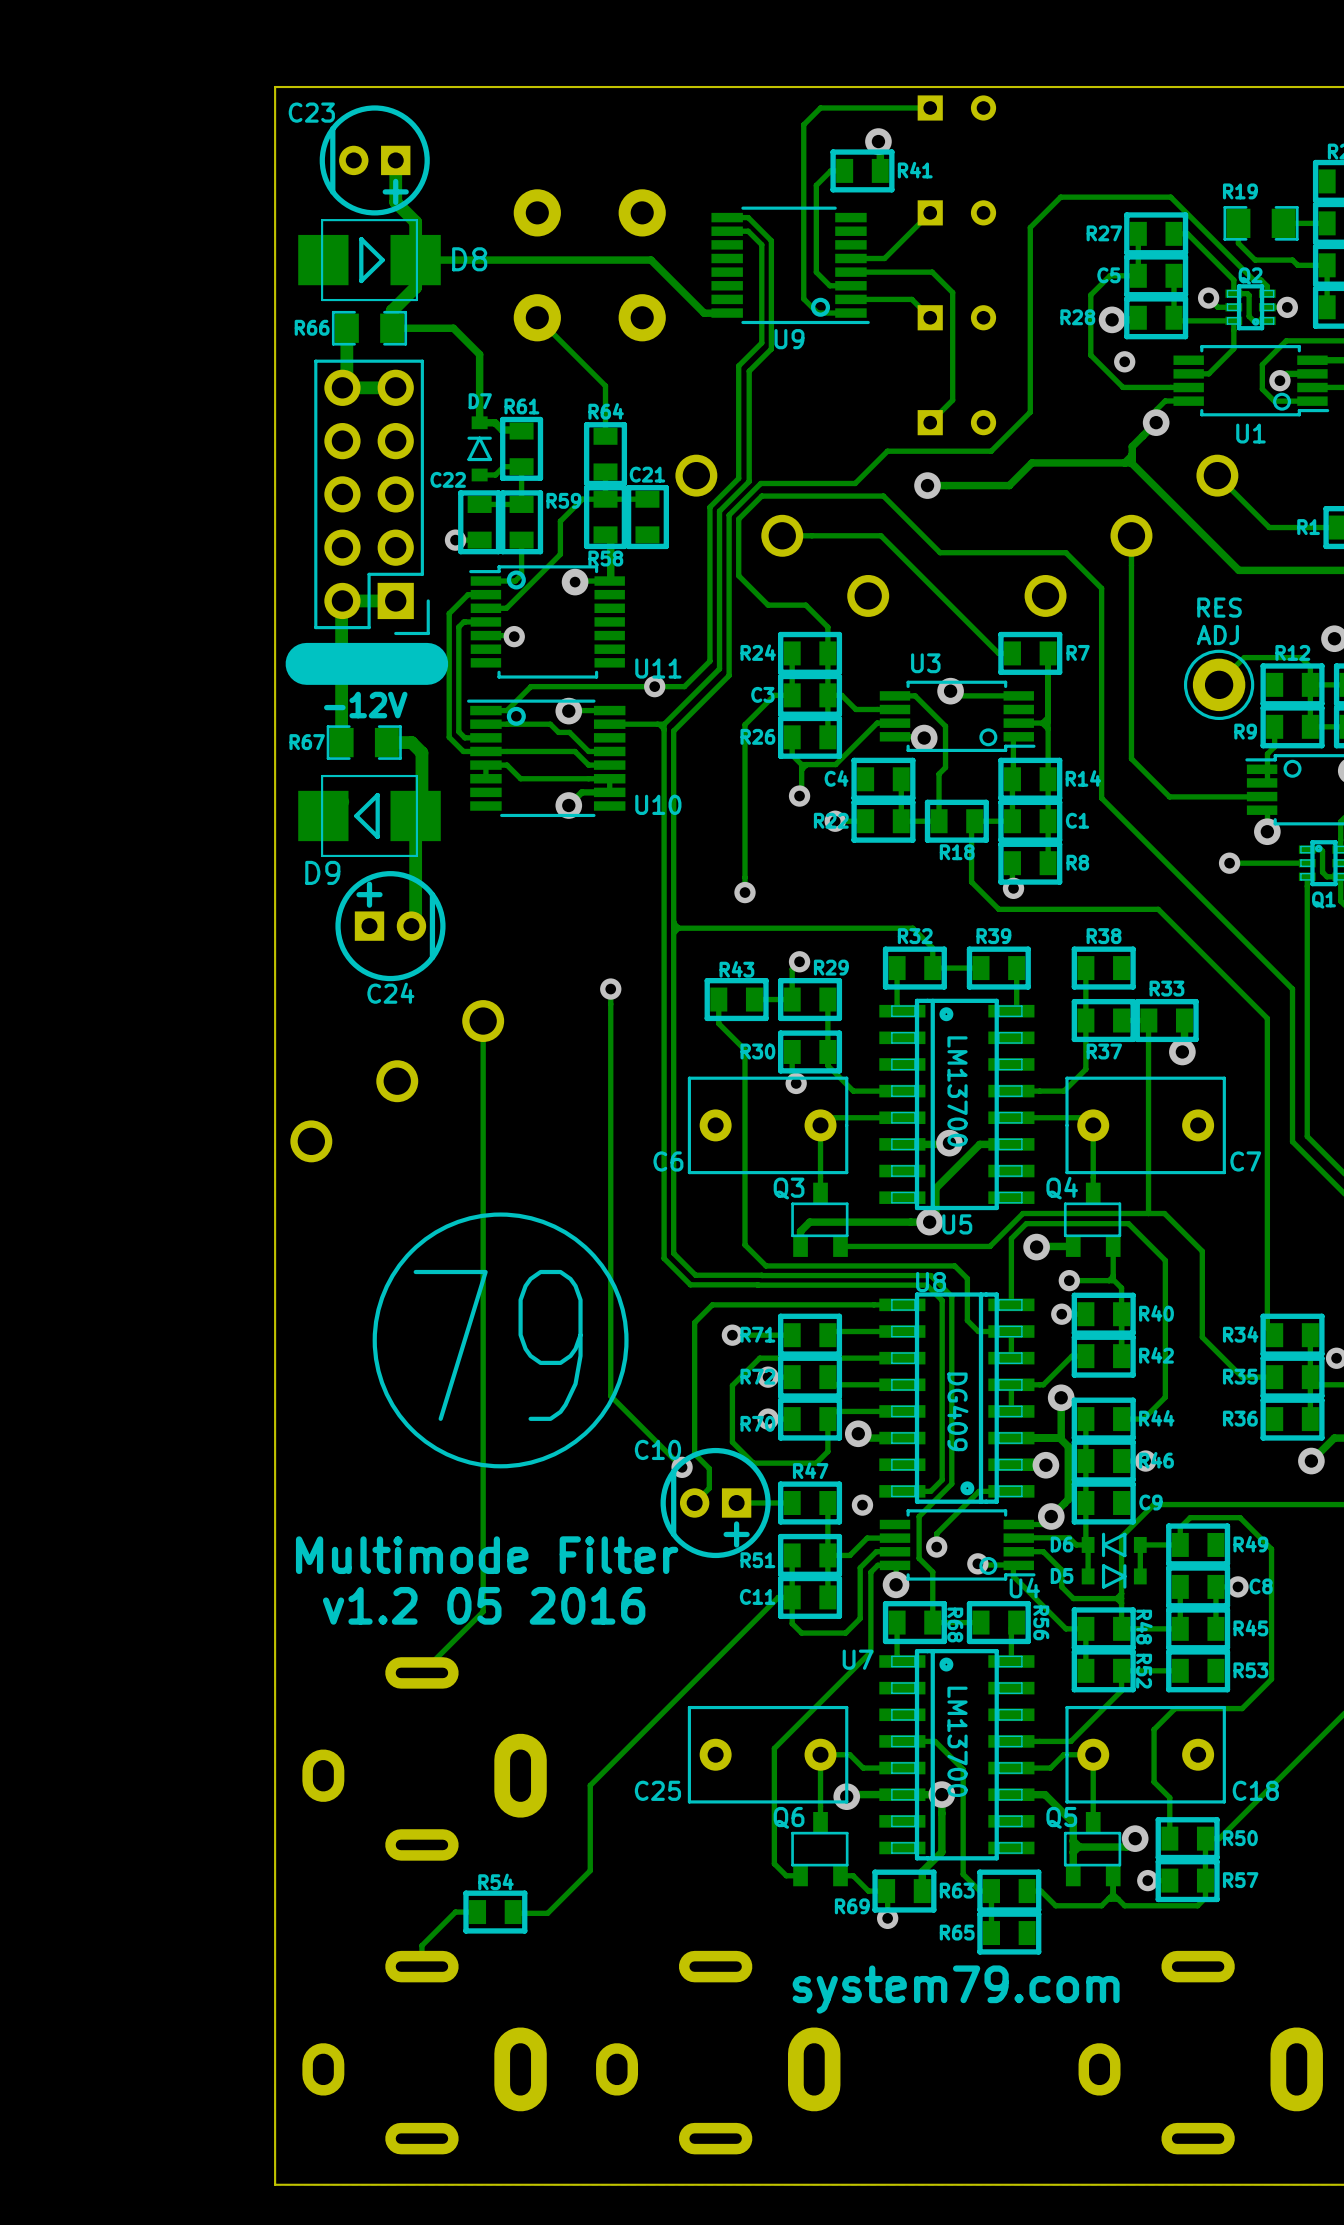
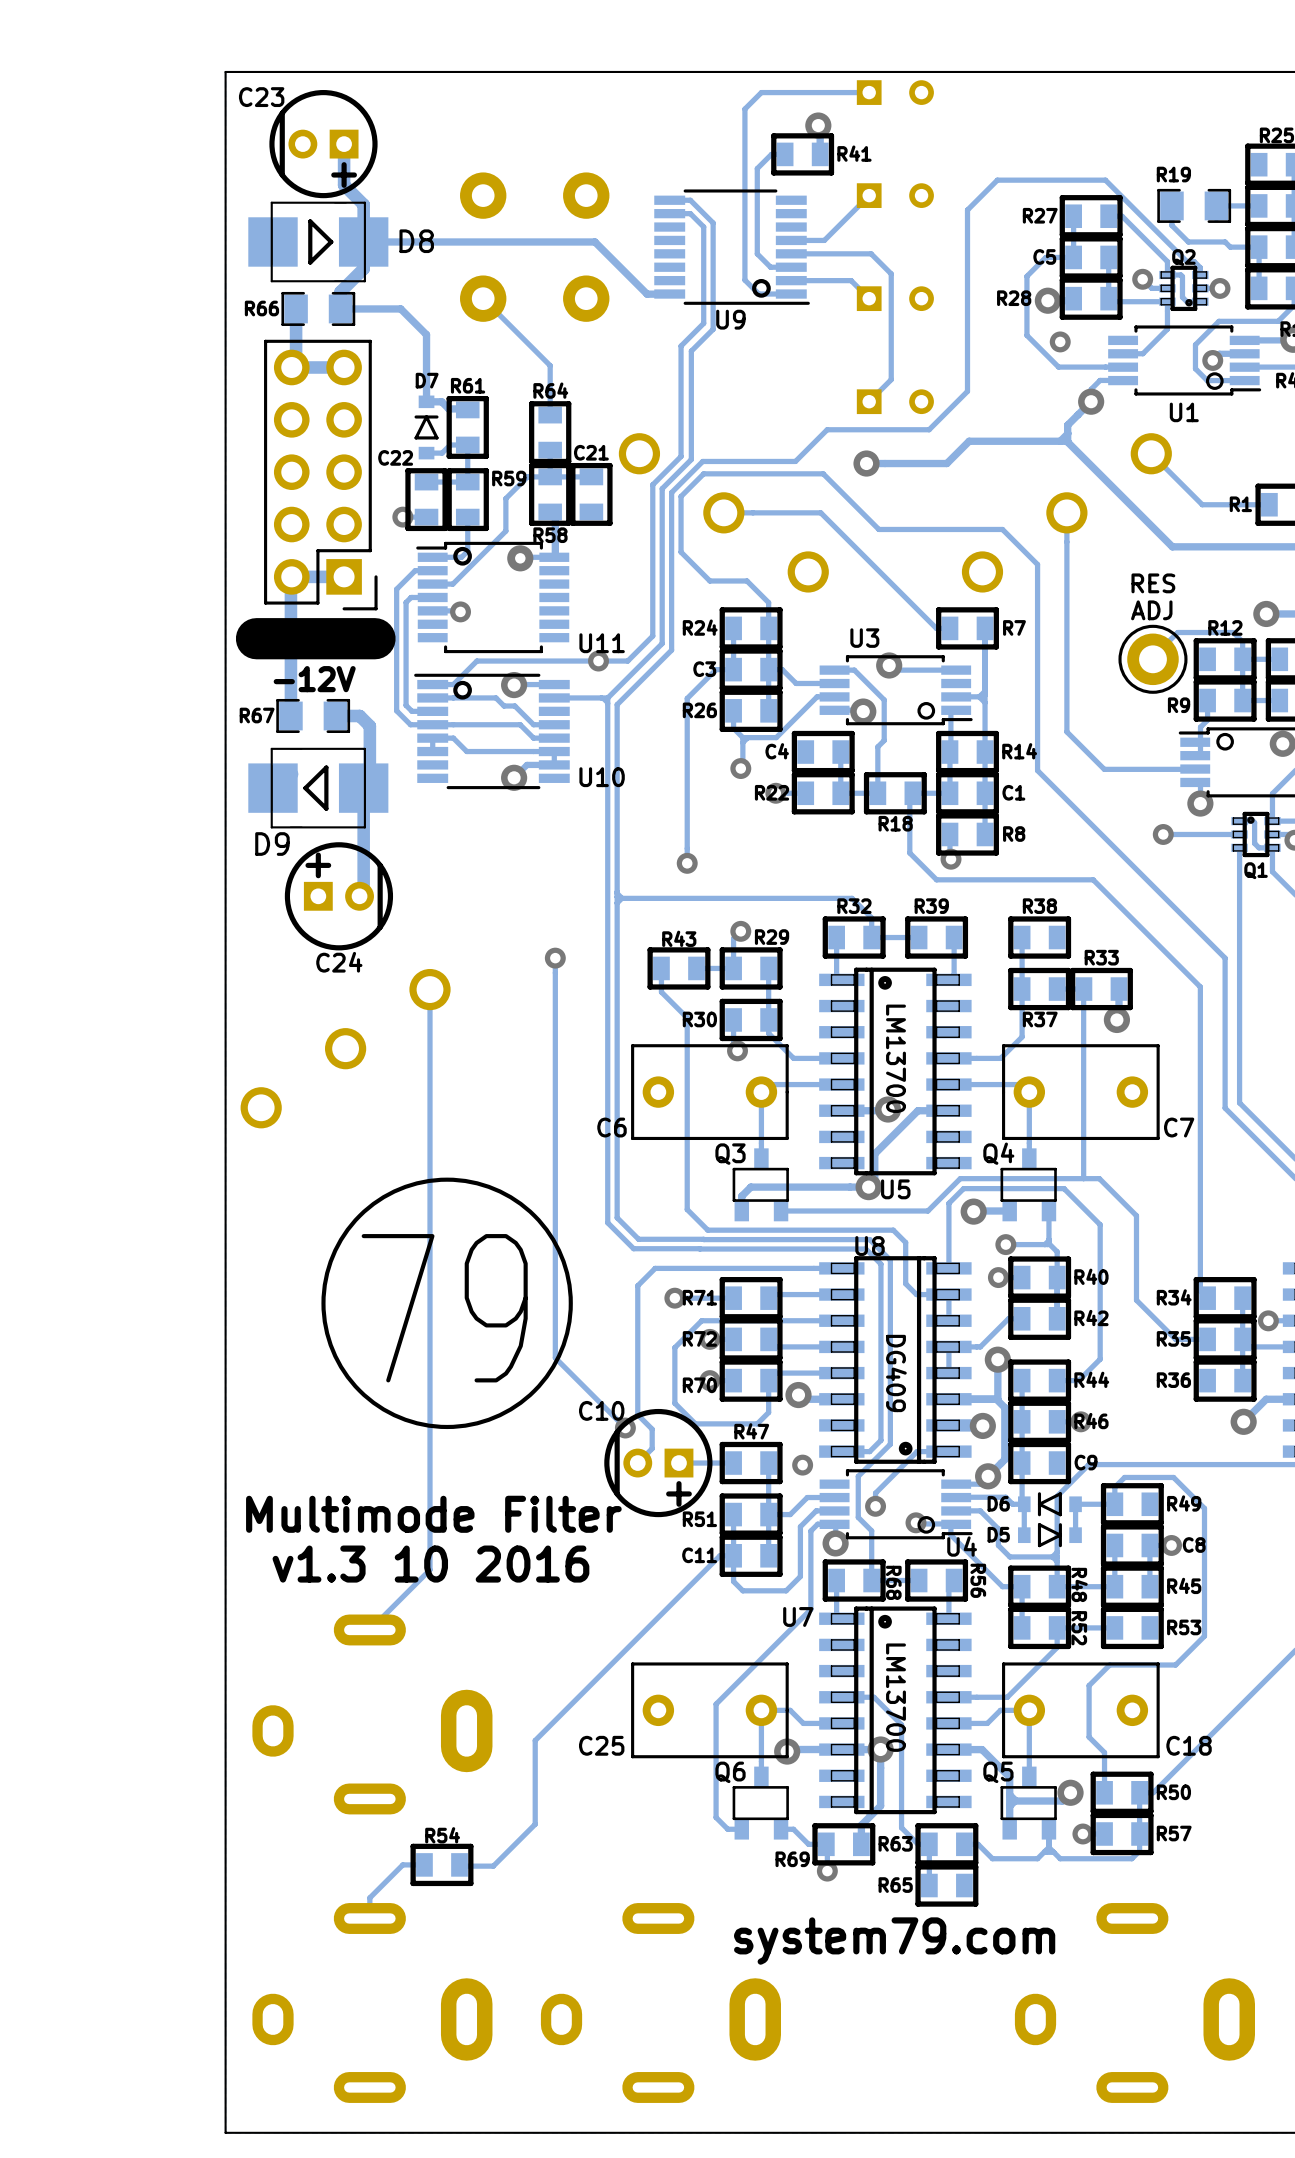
text: v1.2 05 2016 (484, 1605) -> v1.3 10 2016 (430, 1564)

